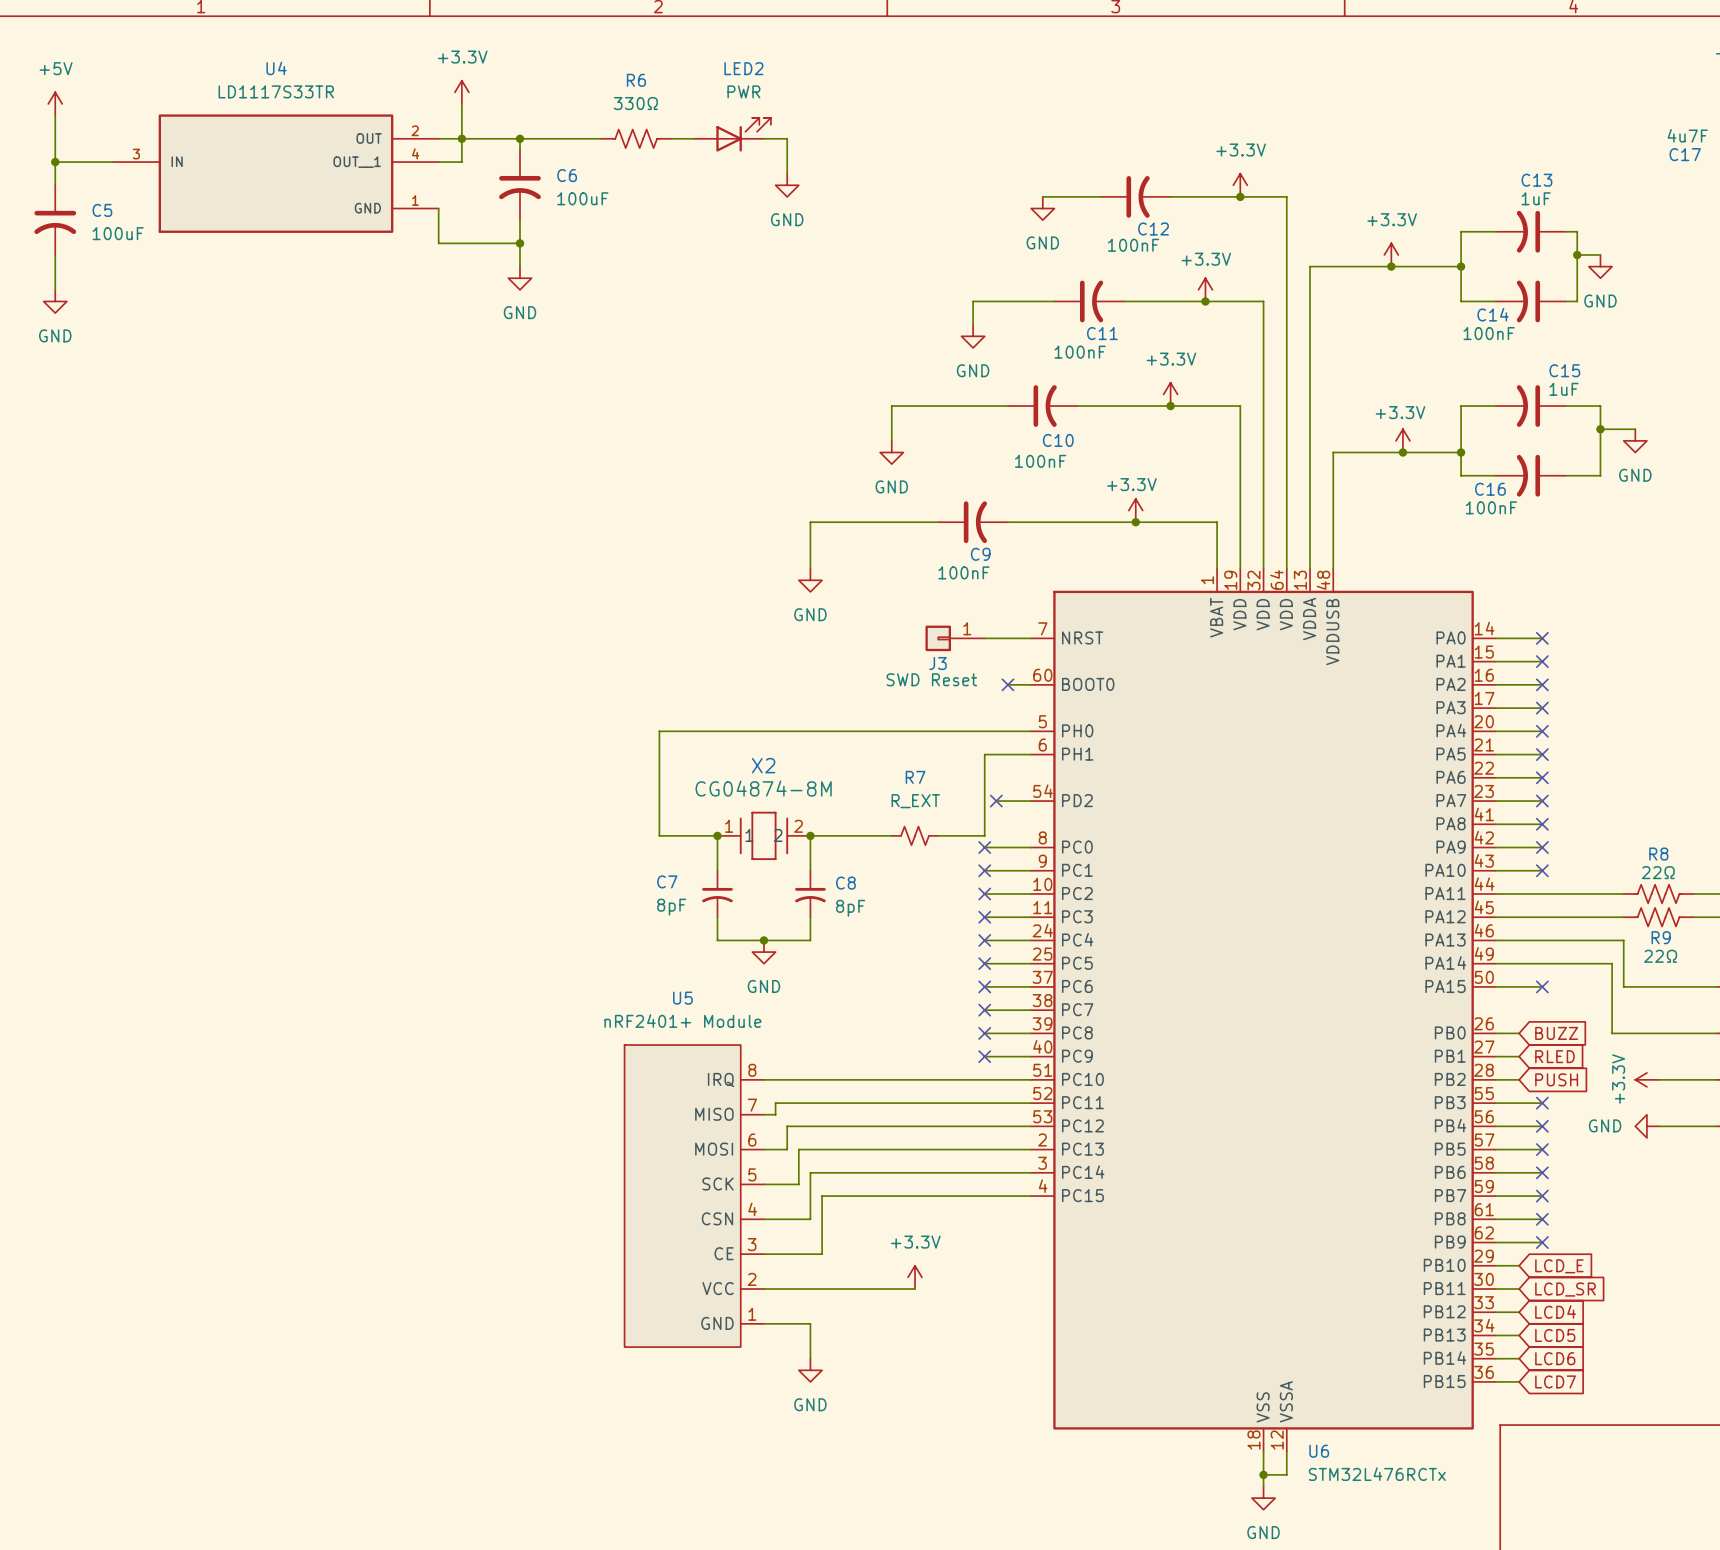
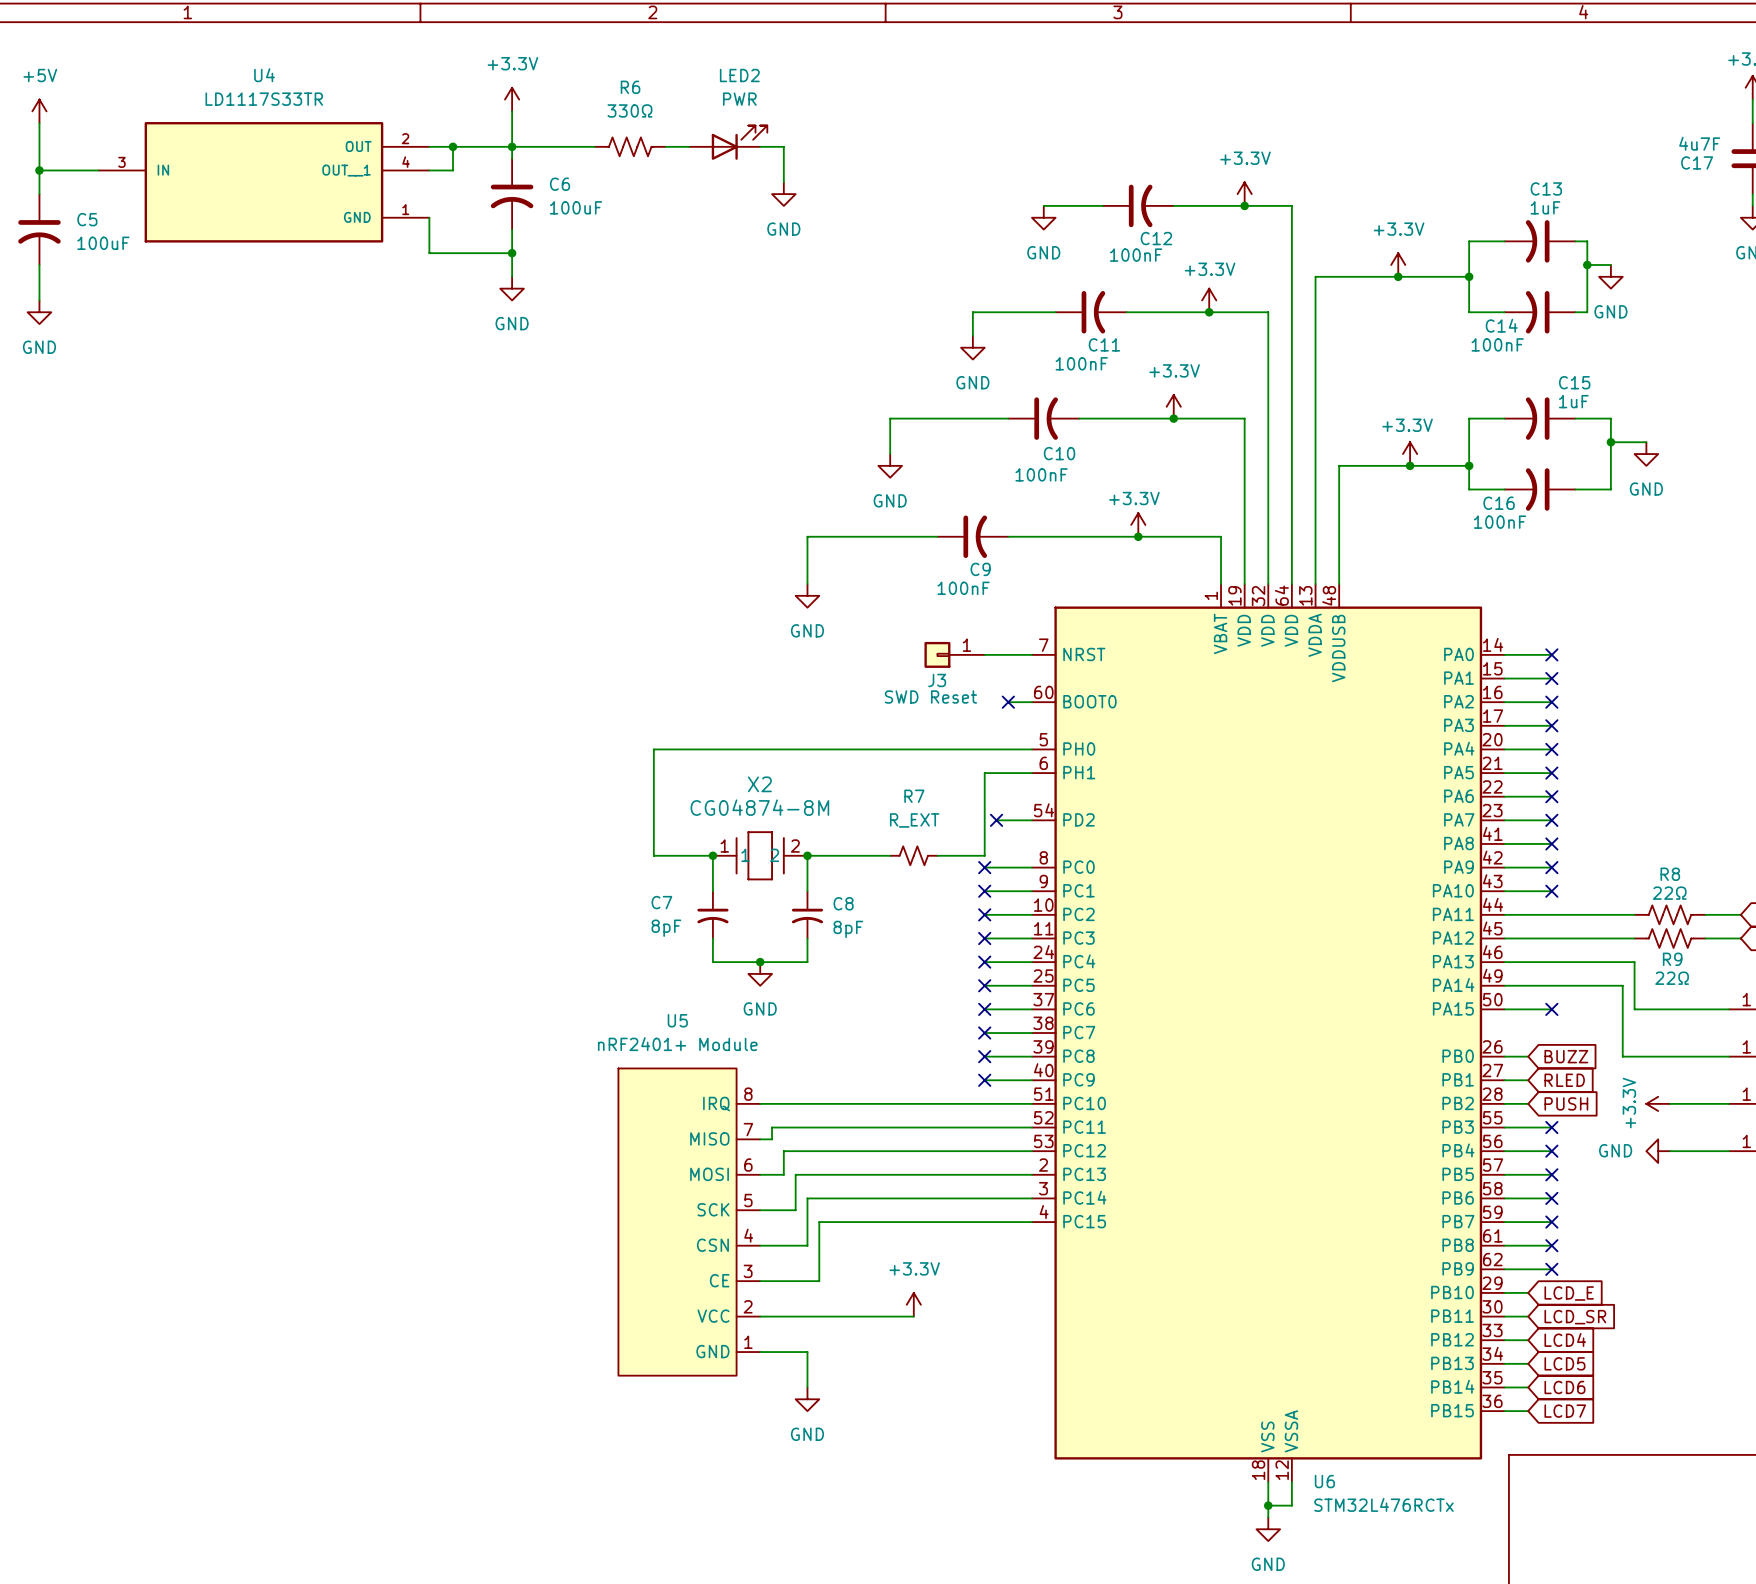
power symbol position: +3.3V (461, 92) -> +3.3V (512, 99)
wire: (461, 103) (461, 138) -> (512, 111) (512, 146)

